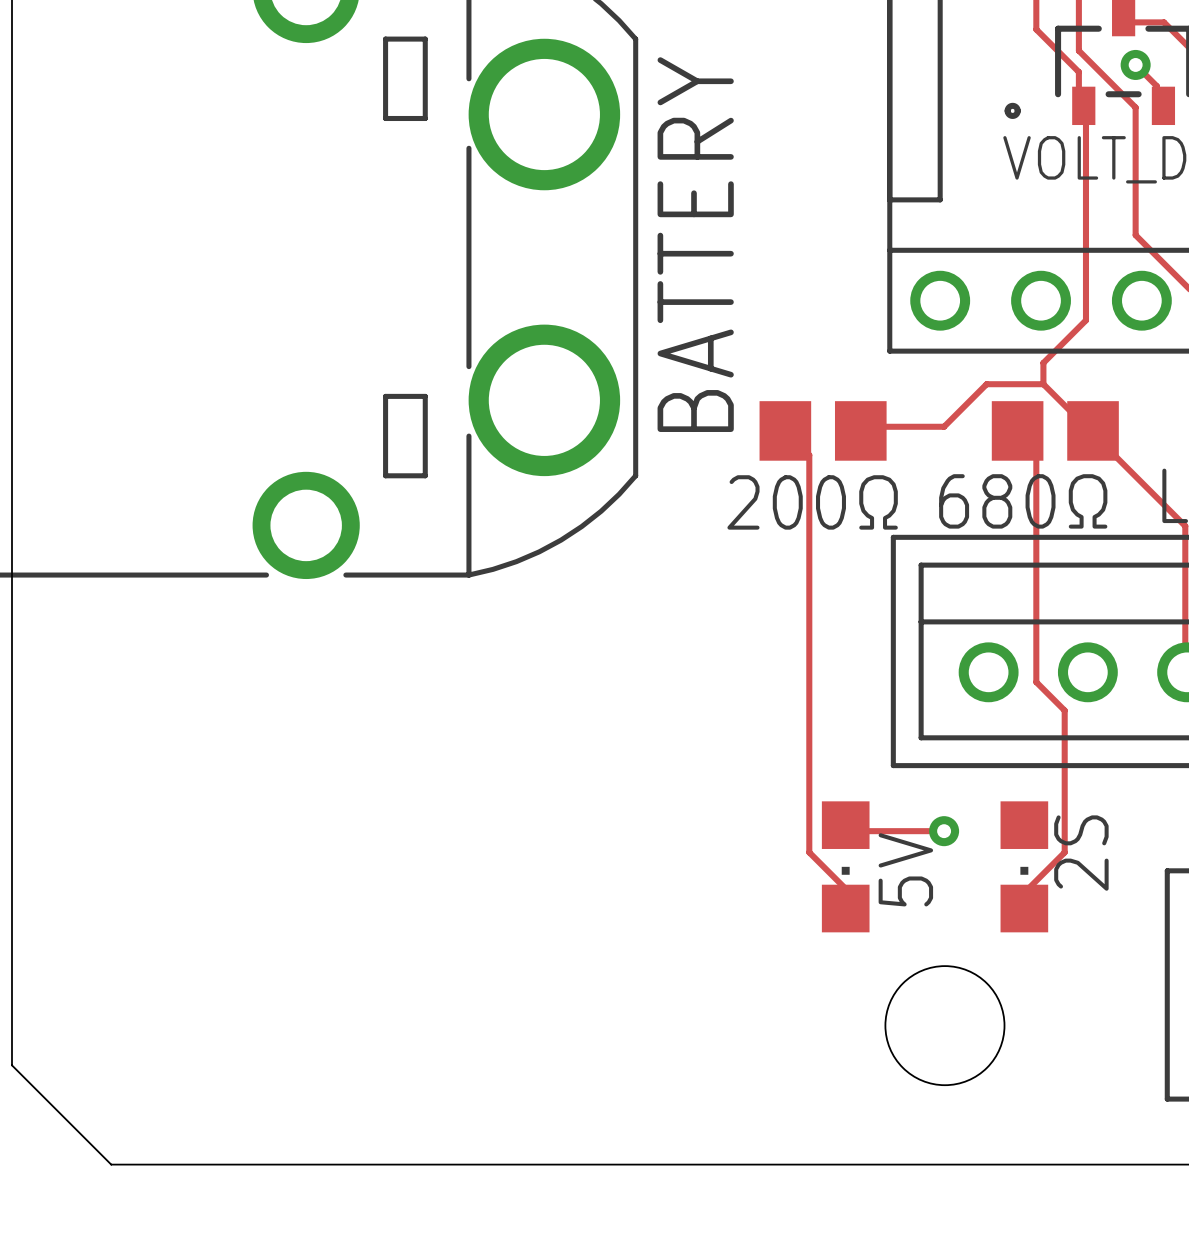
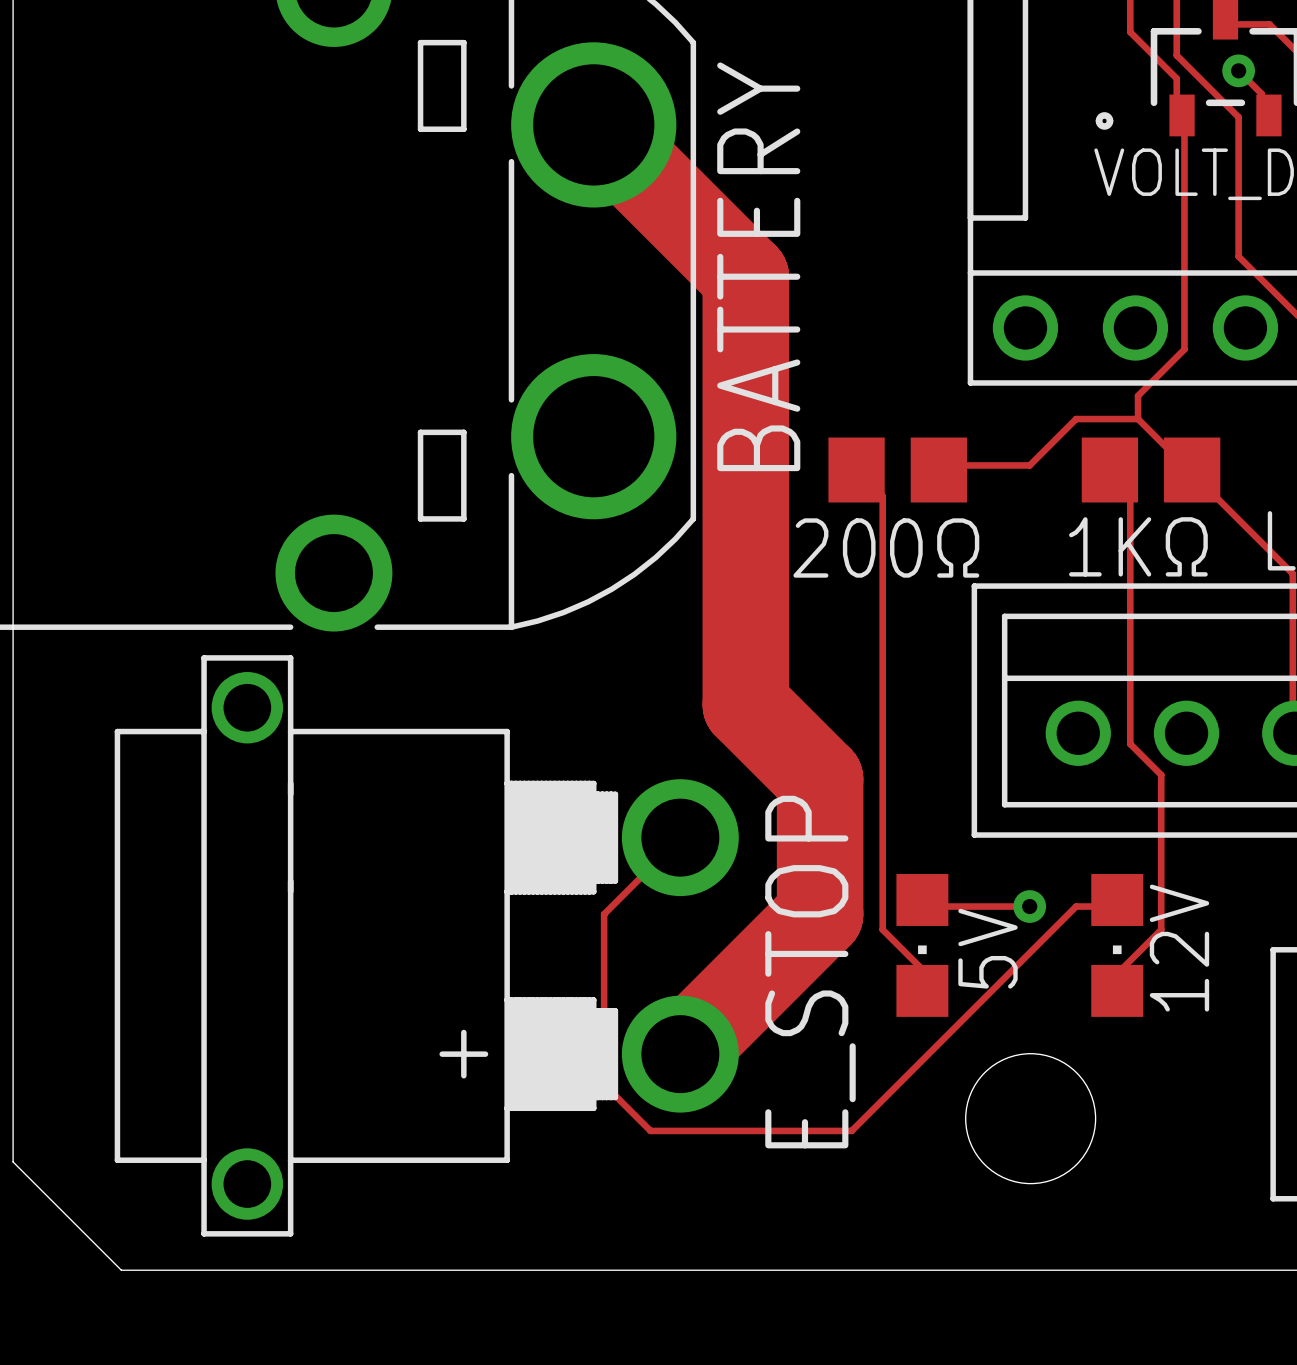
track: none -> (593, 124) (745, 276) (745, 705) (820, 779) (820, 914) (680, 1054)
680Ω name: 680Ω (1023, 501) -> 1KΩ (1138, 546)
track: none -> (680, 837) (604, 914) (604, 1084) (650, 1130) (851, 1130) (1076, 906) (1114, 906) (1117, 899)
2S name: 2S (1081, 853) -> 12V (1179, 948)
E_STOP: none -> (426, 945)

